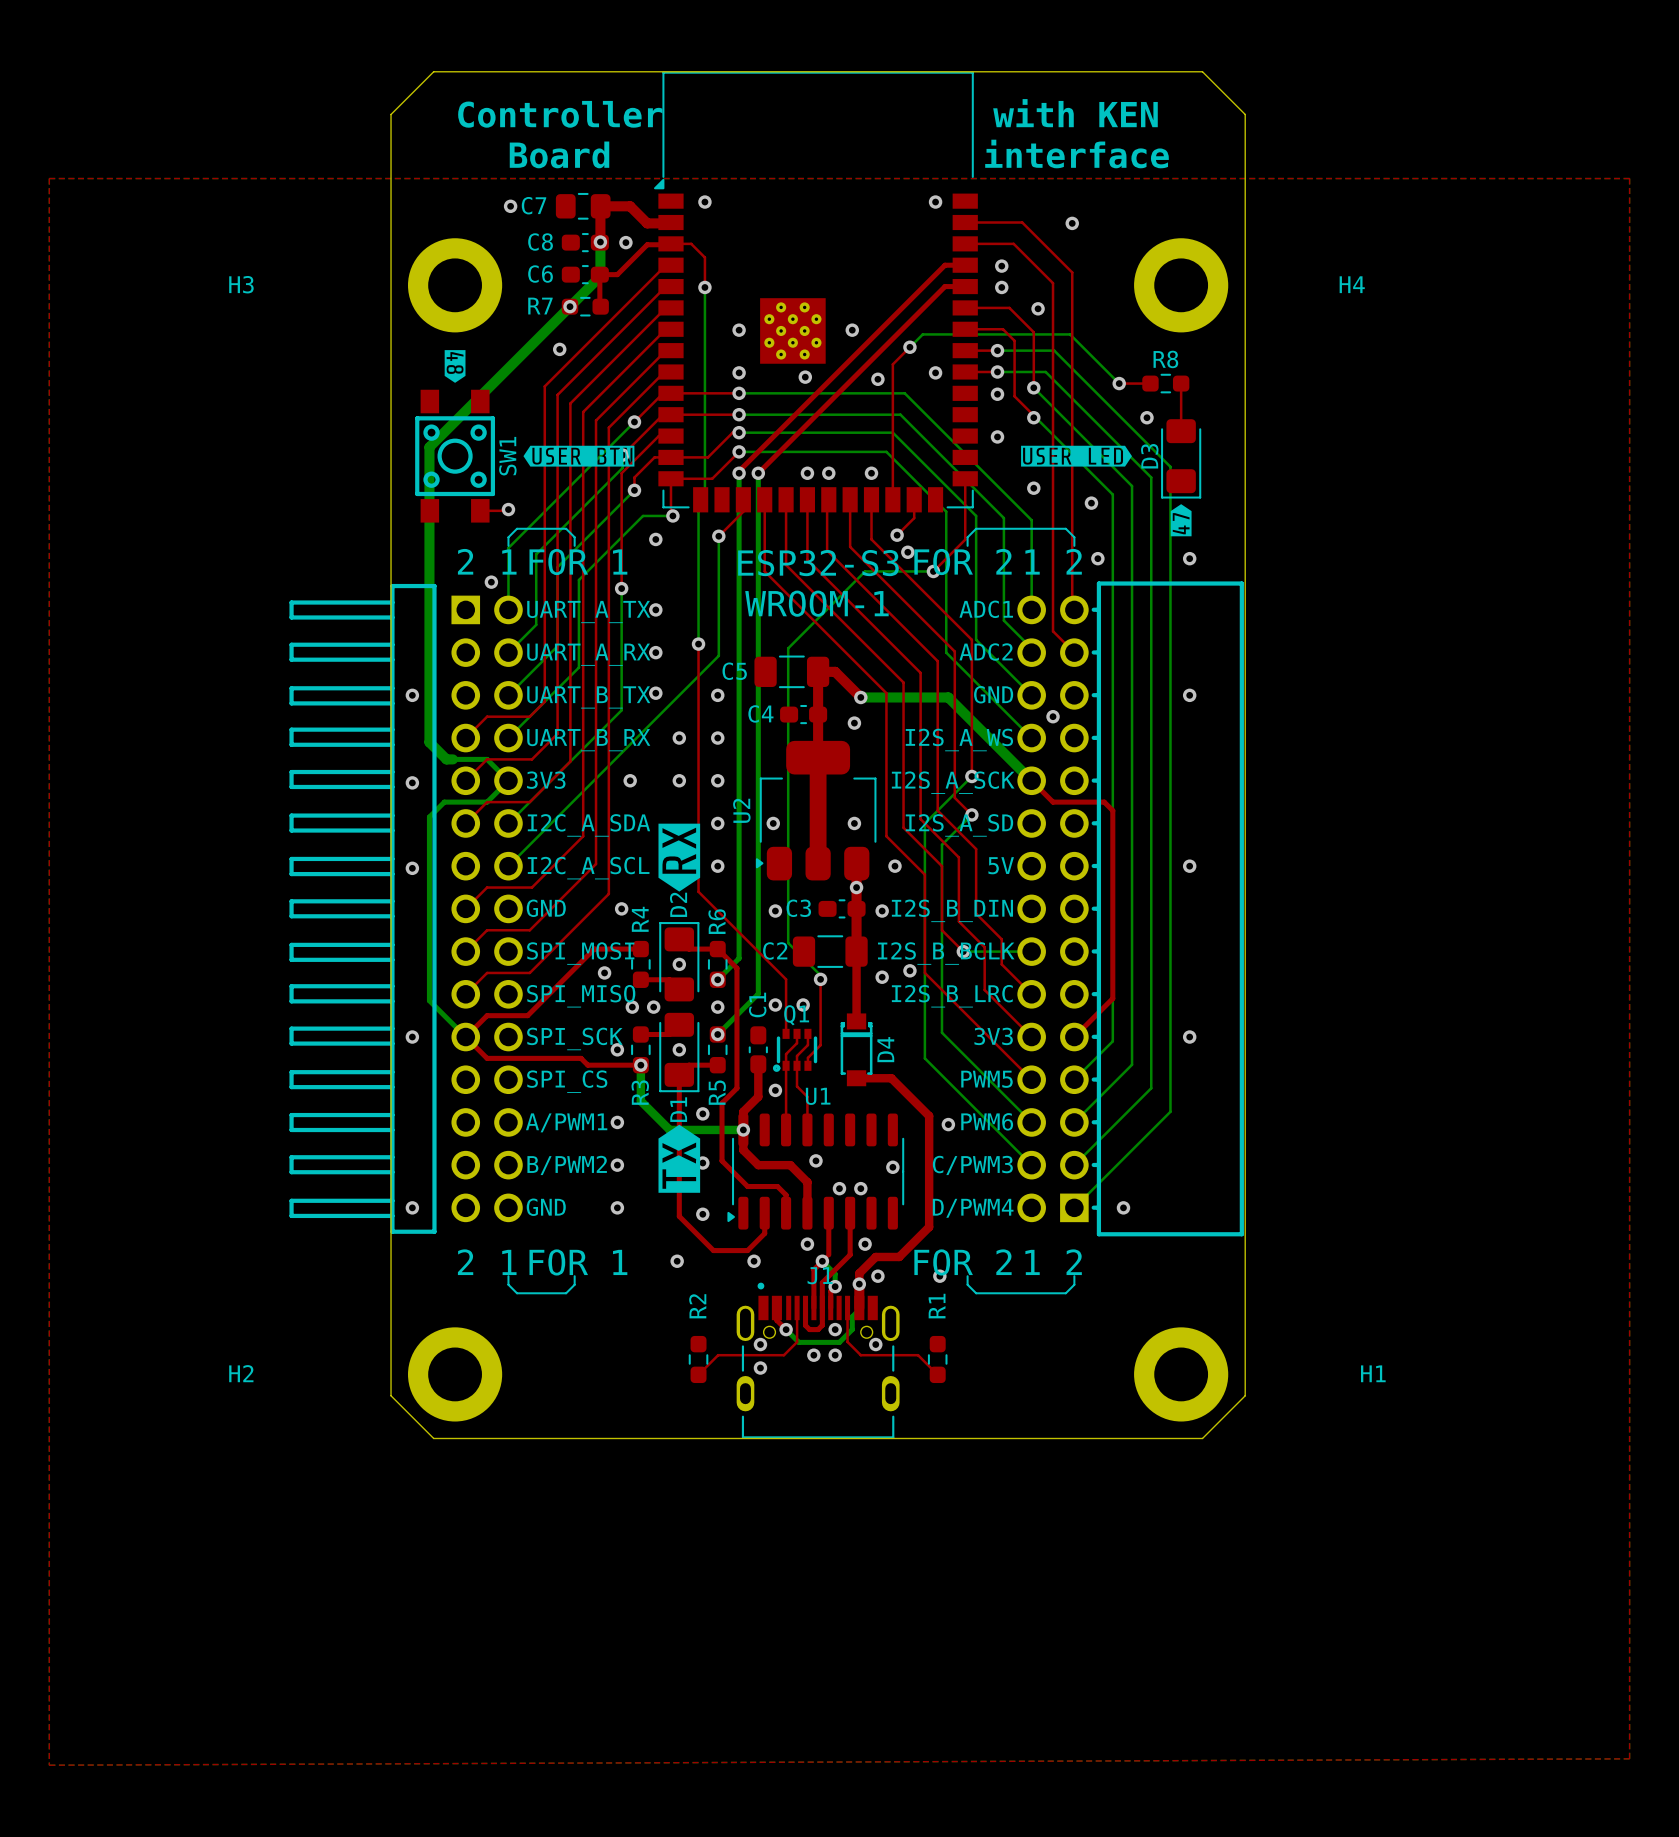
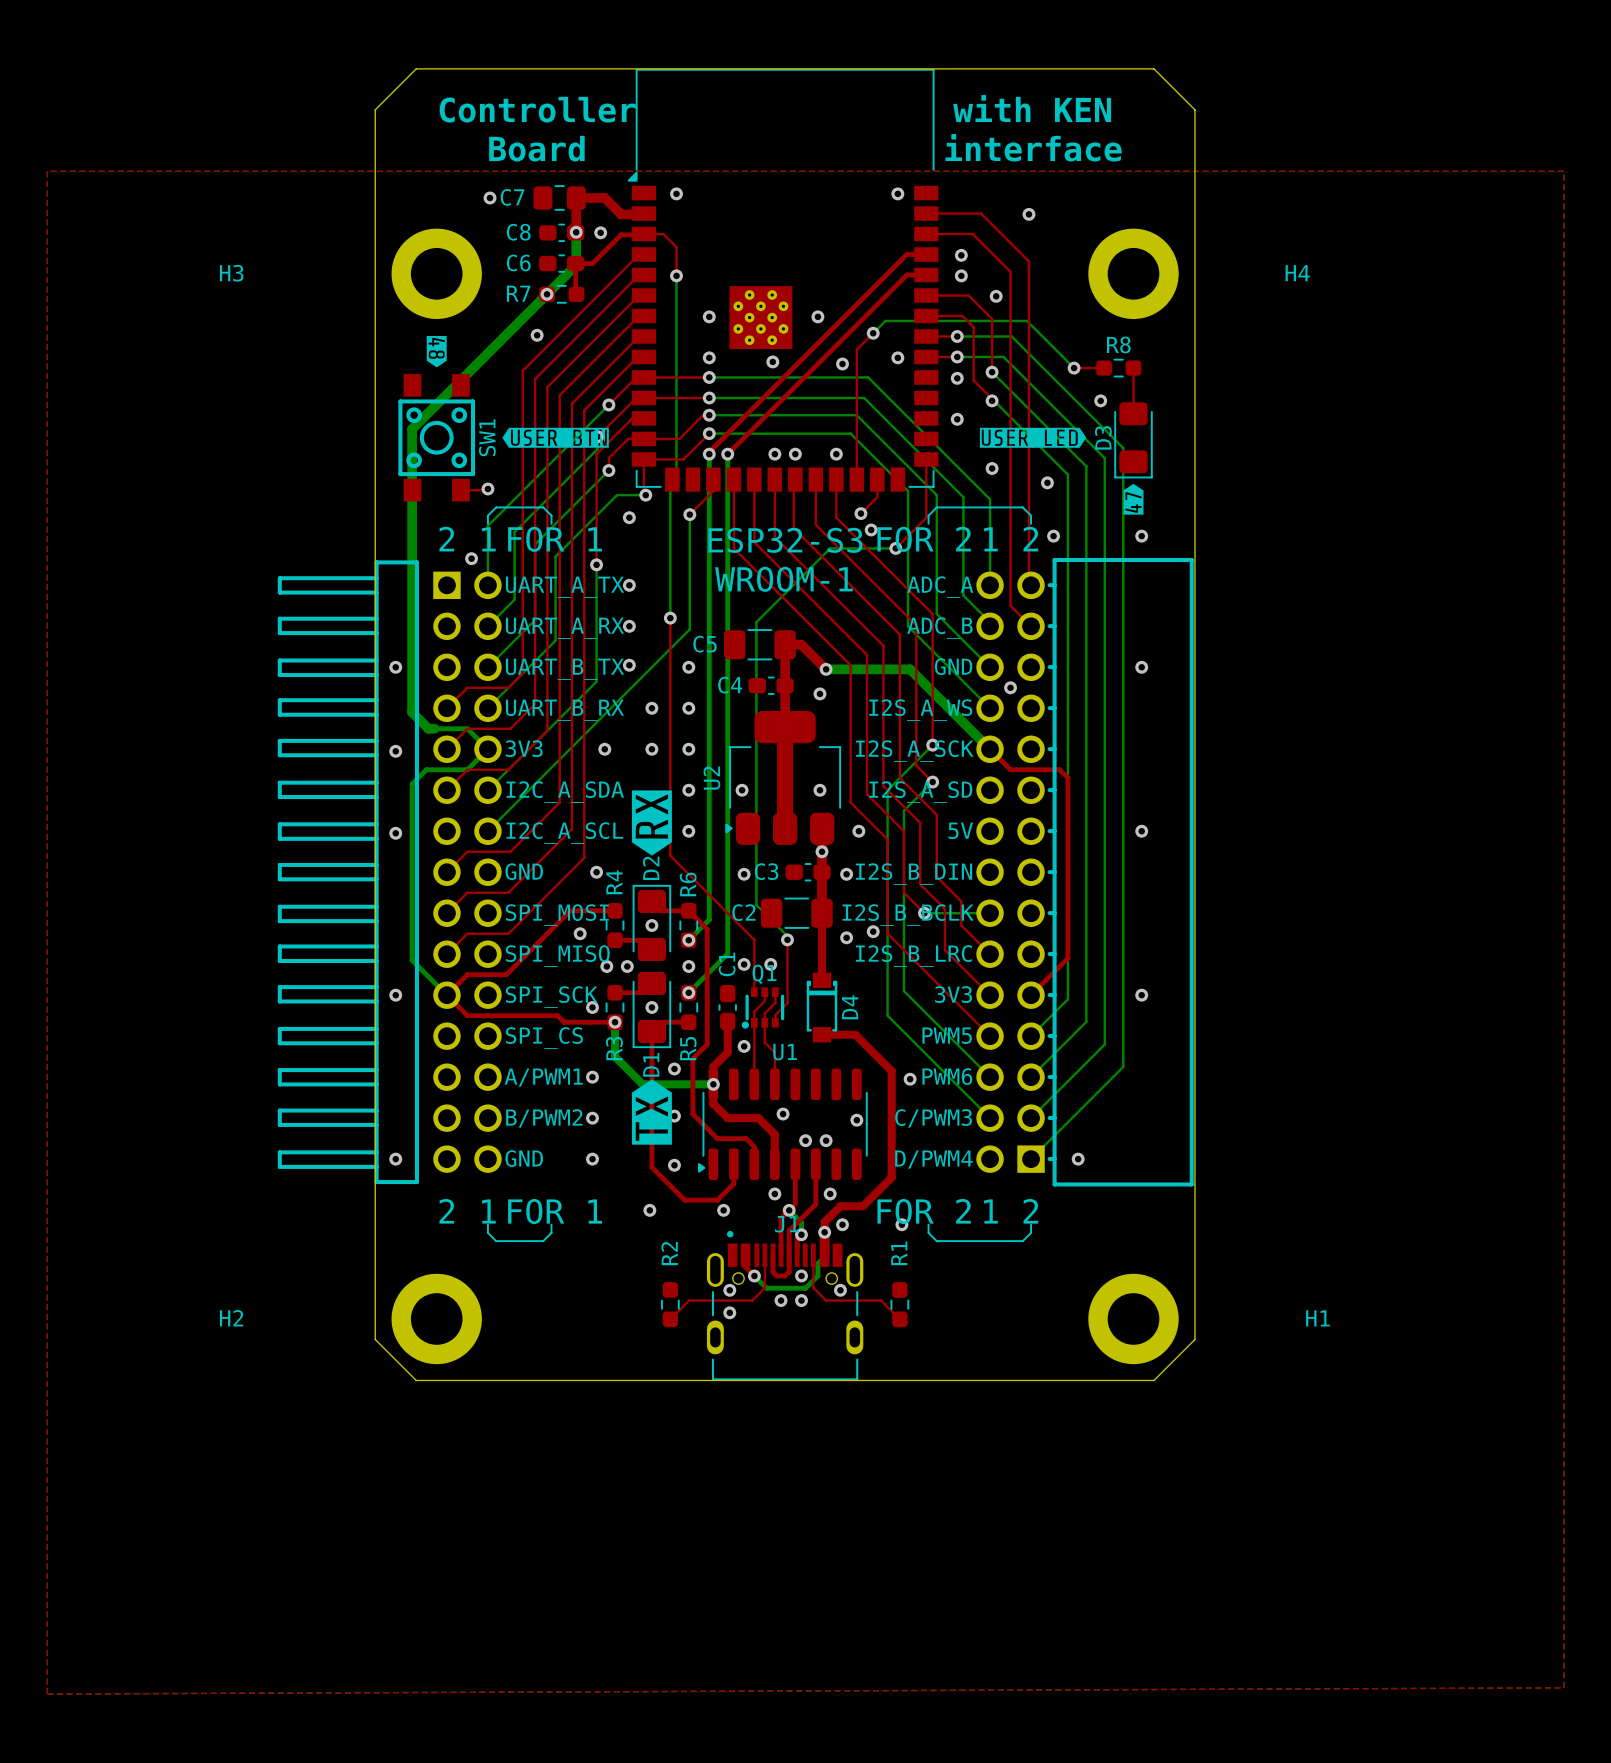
text: ADC1 (986, 609) -> ADC_A (940, 587)
text: ADC2 (986, 652) -> ADC_B (940, 628)

